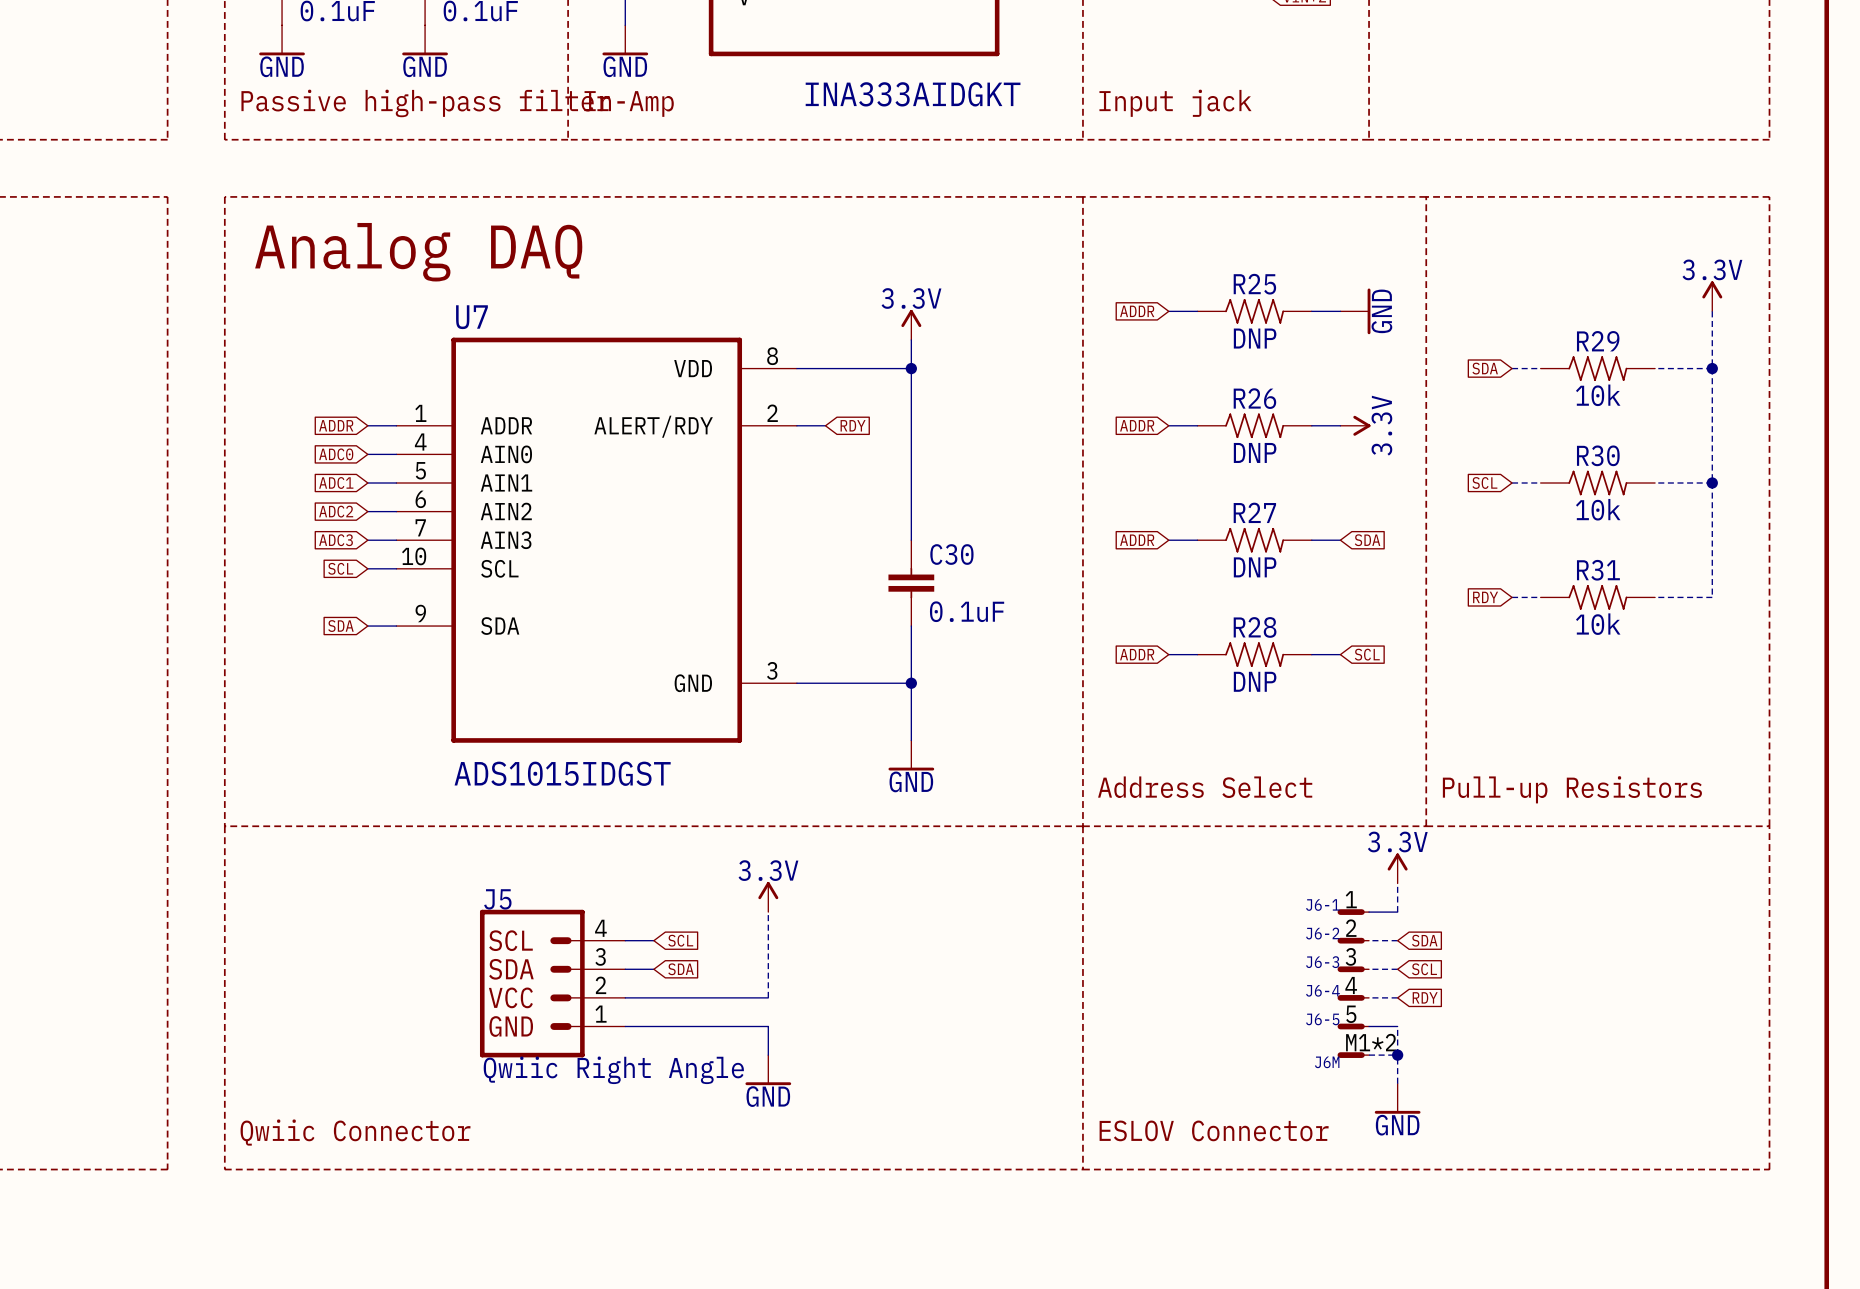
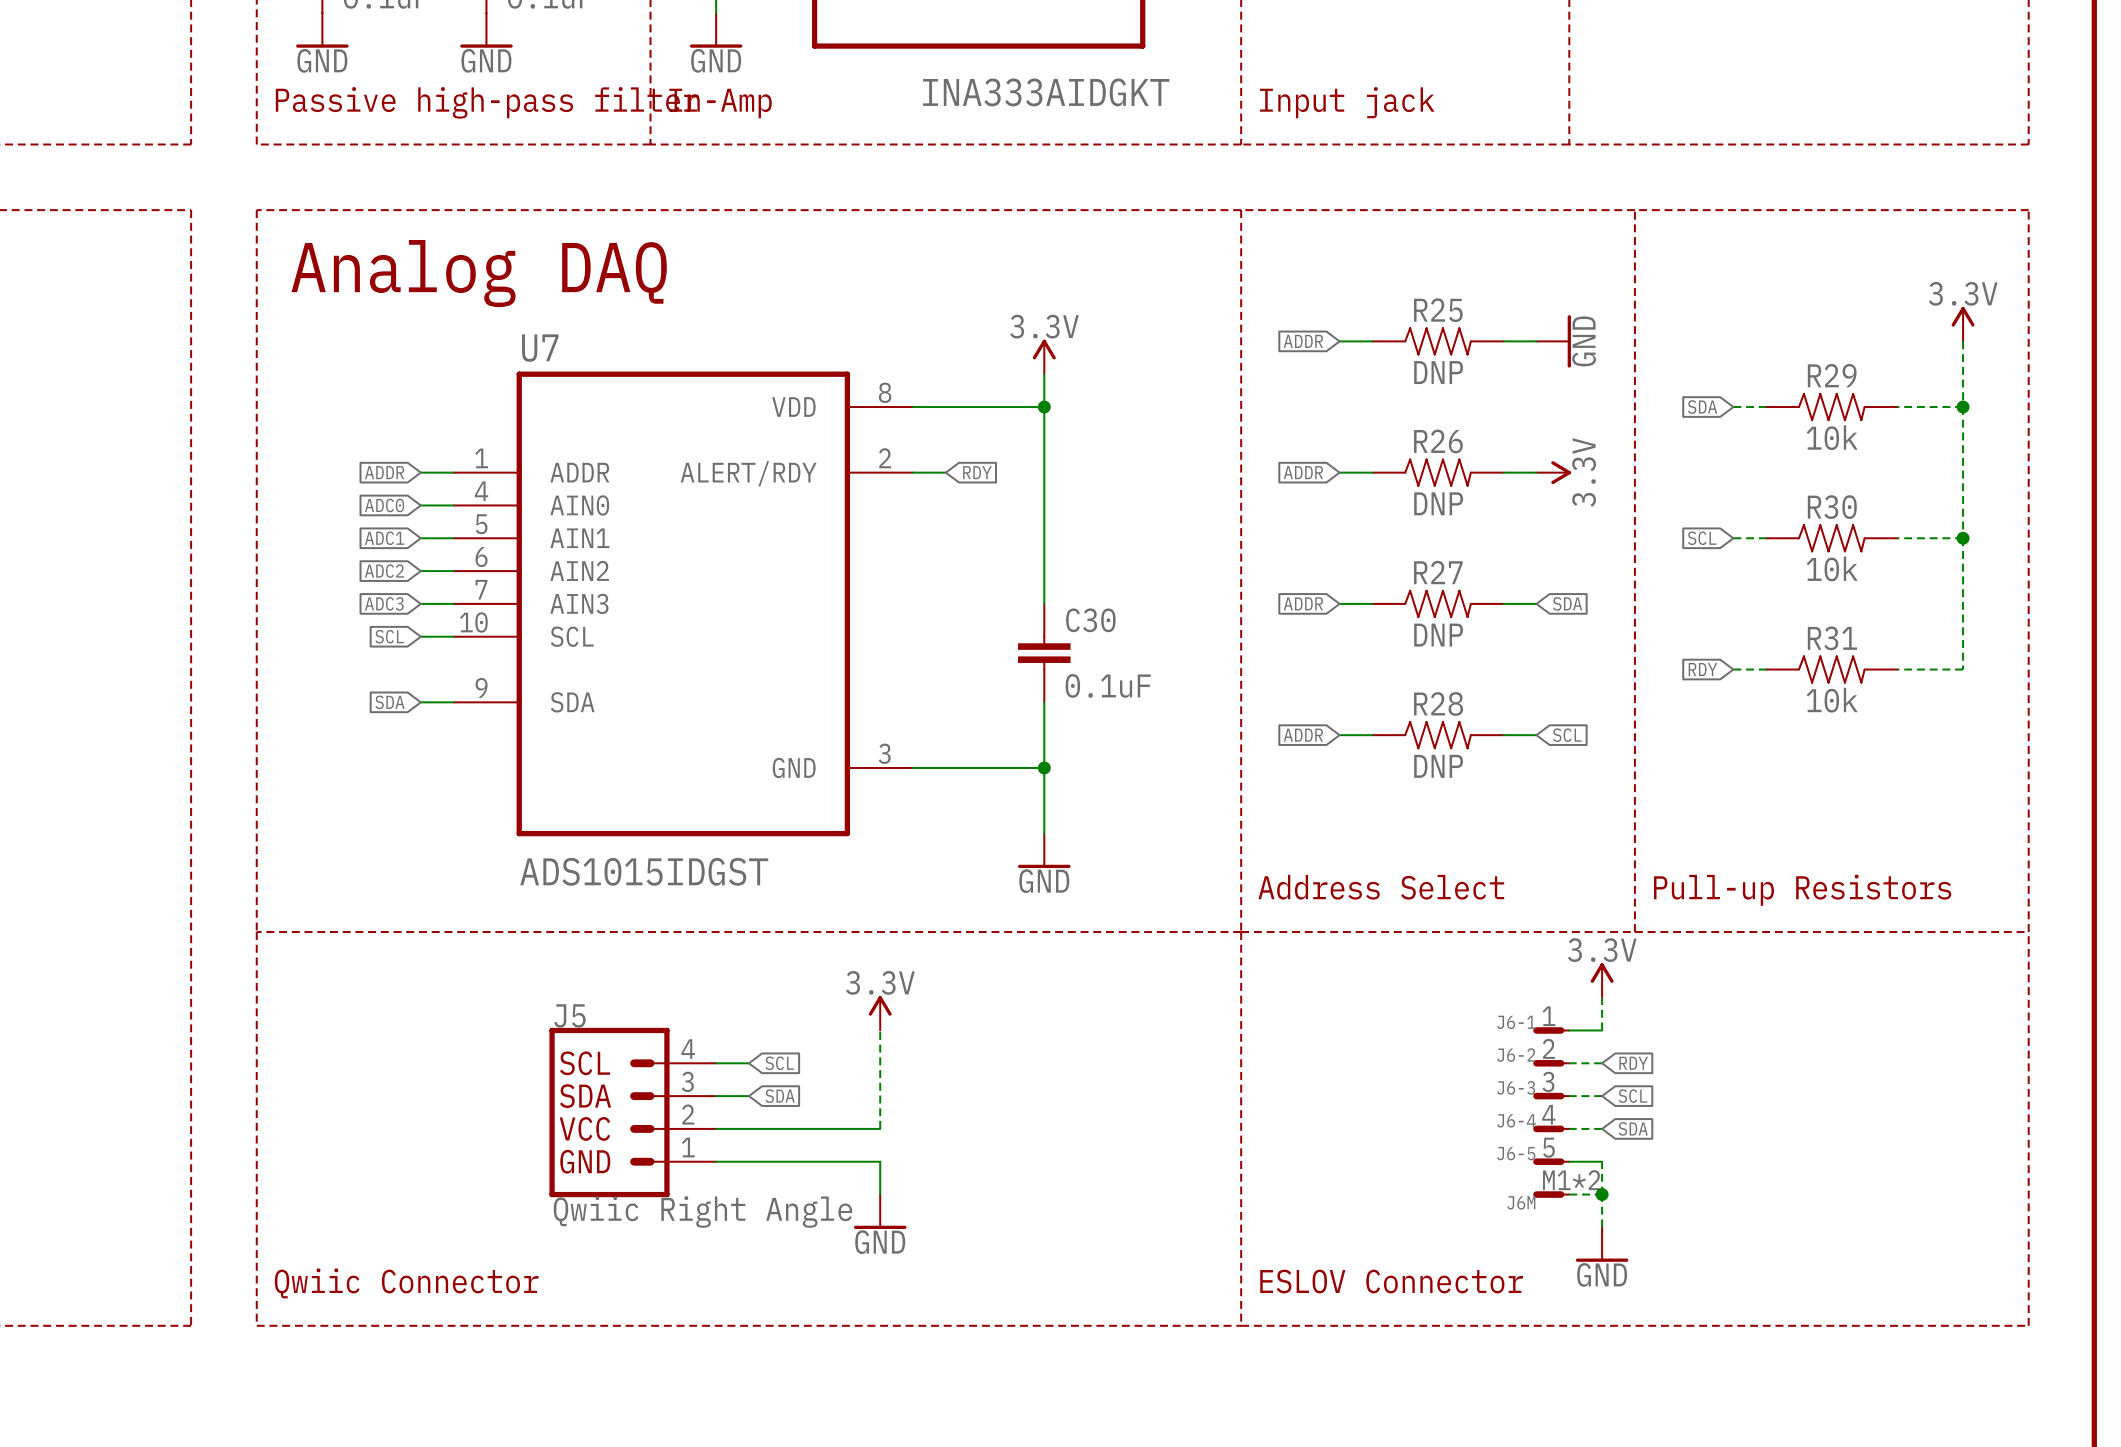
global label: SDA (1424, 940) -> RDY (1633, 1063)
global label: RDY (1425, 997) -> SDA (1633, 1128)

